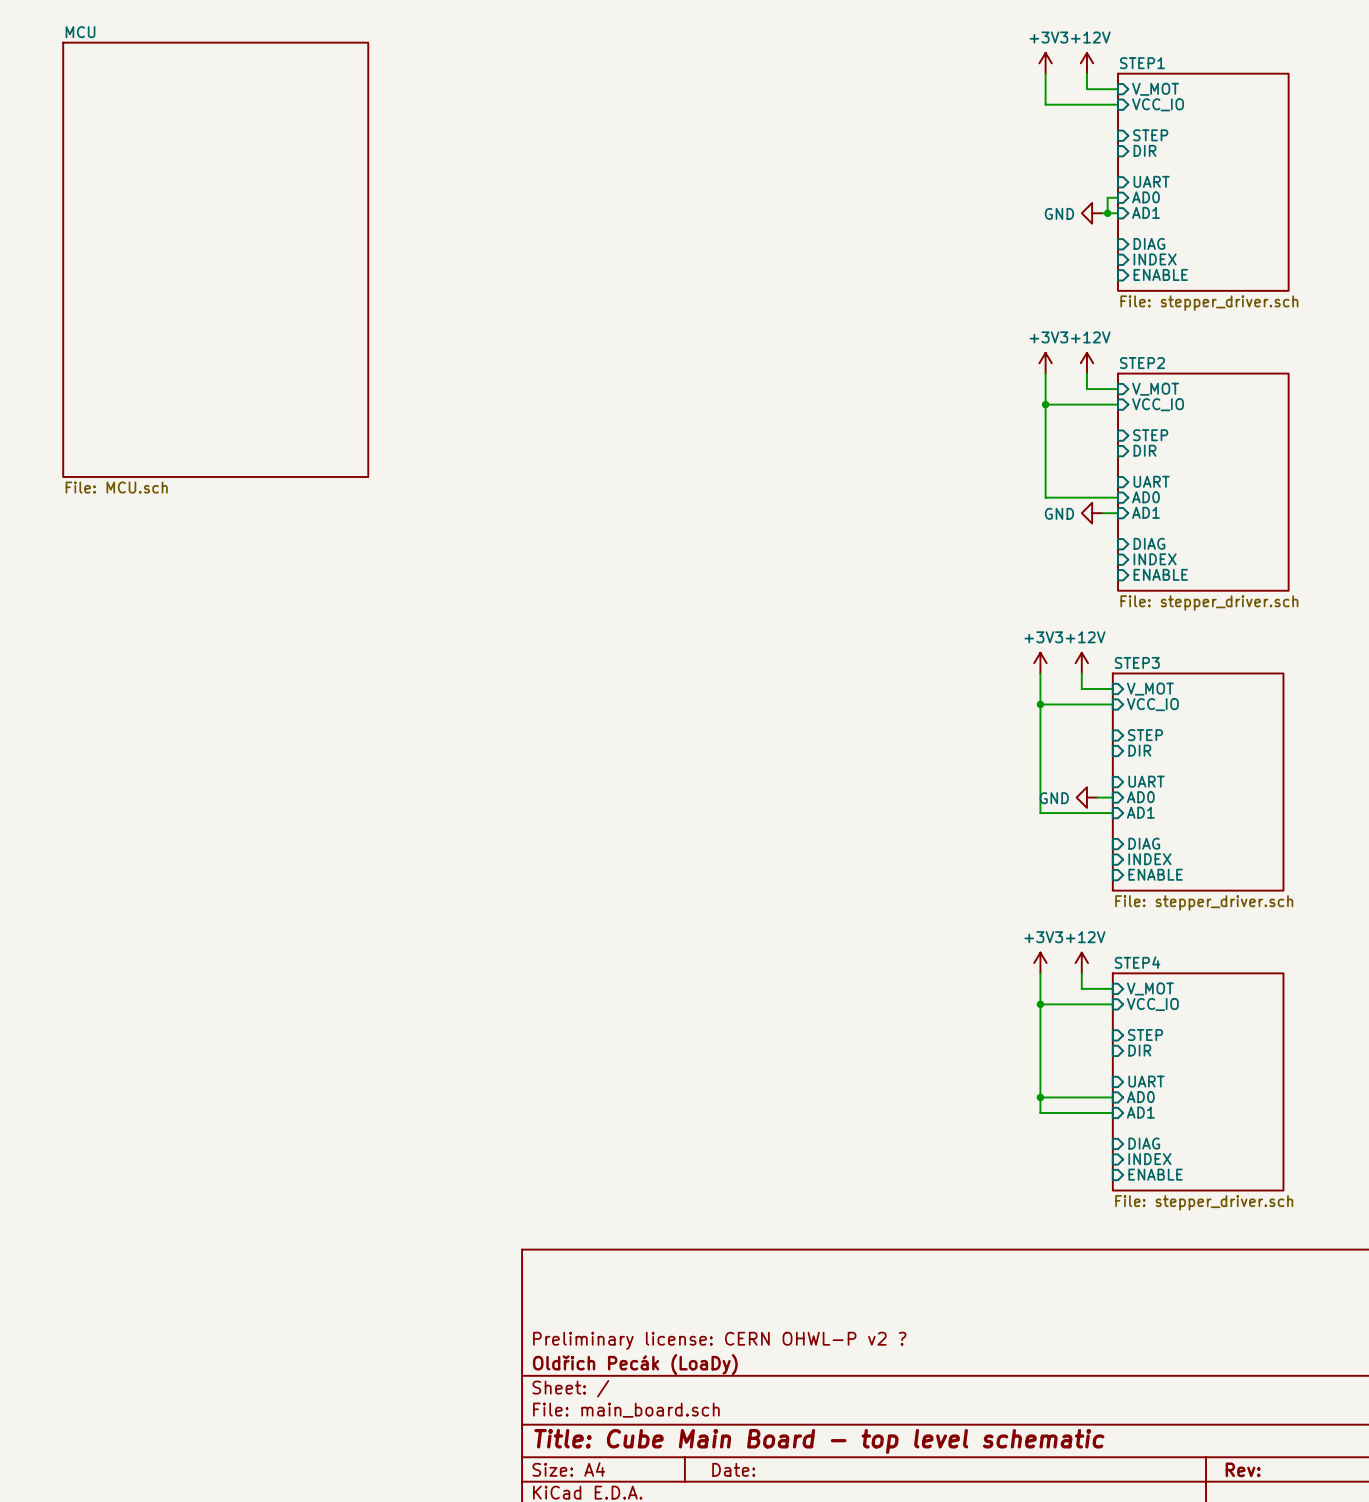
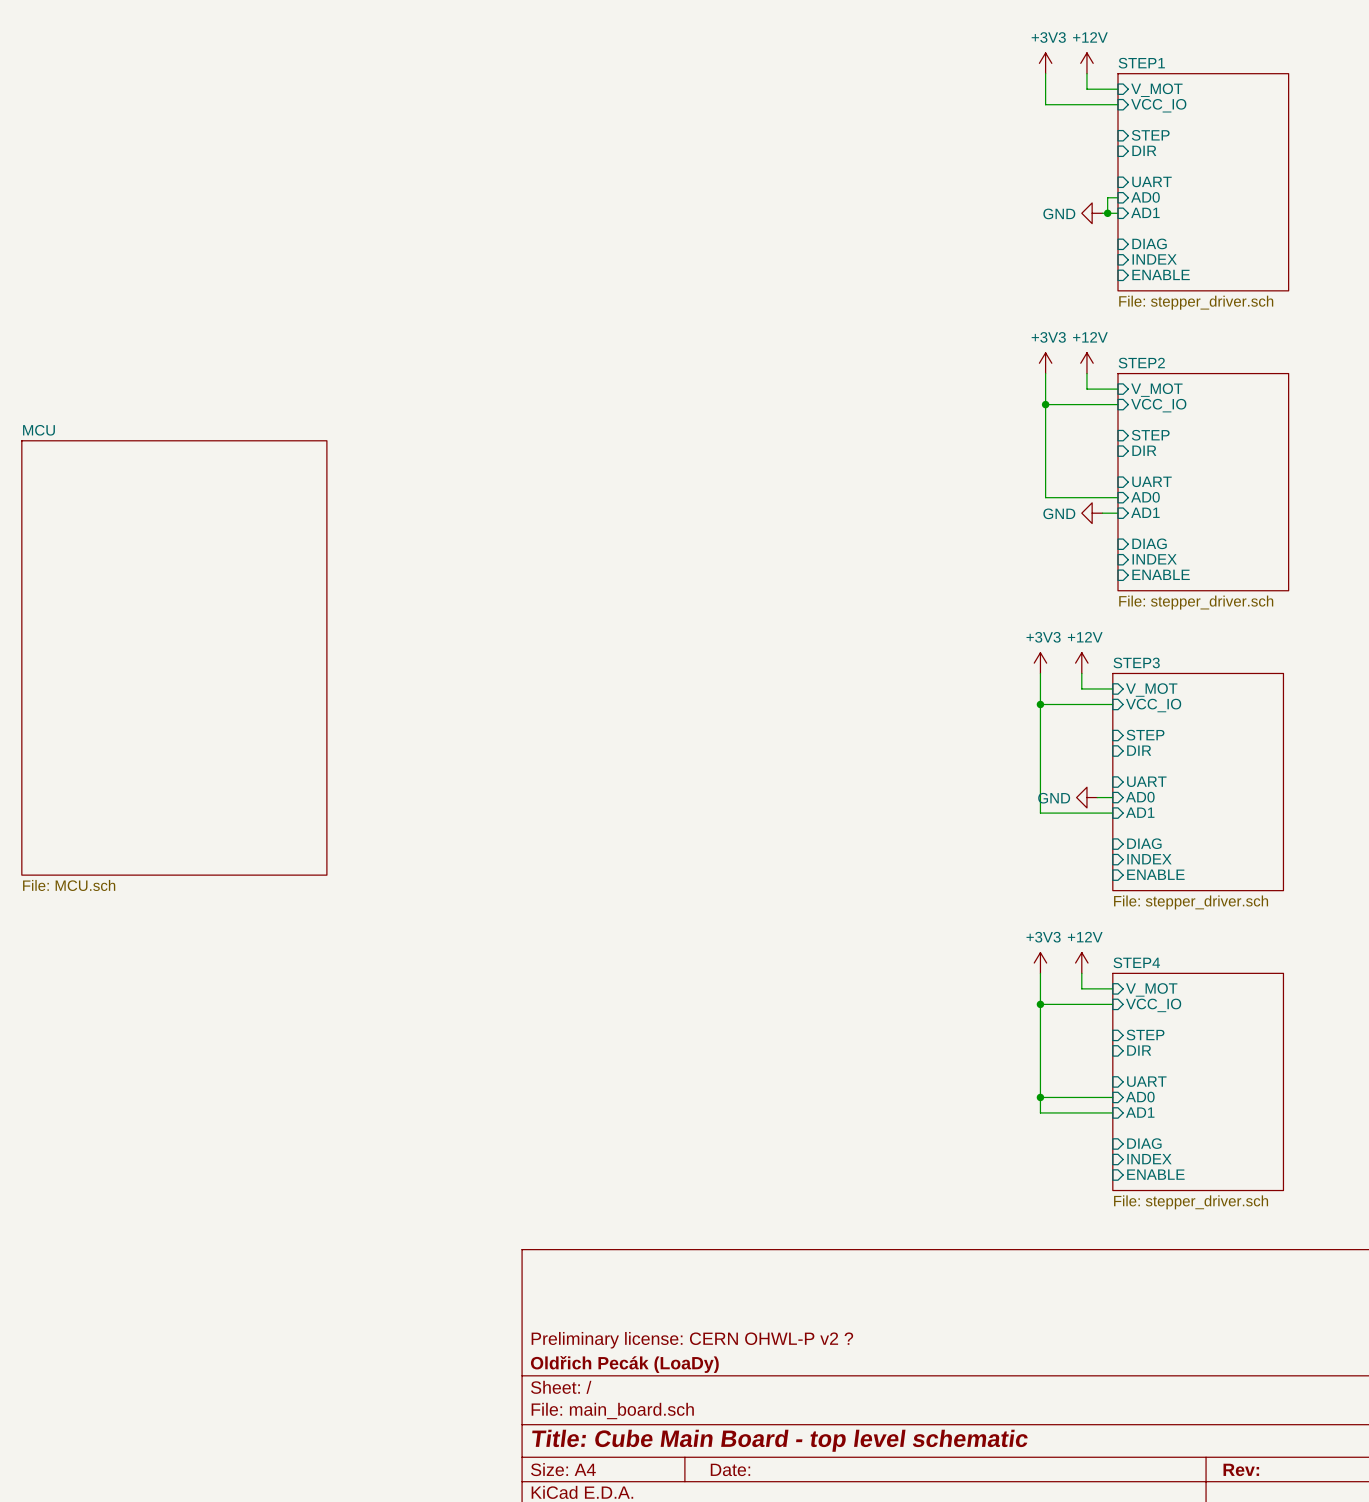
sheet MCU: File: MCU.sch (215, 259) -> none
sheet MCU: none -> File: MCU.sch (174, 657)

